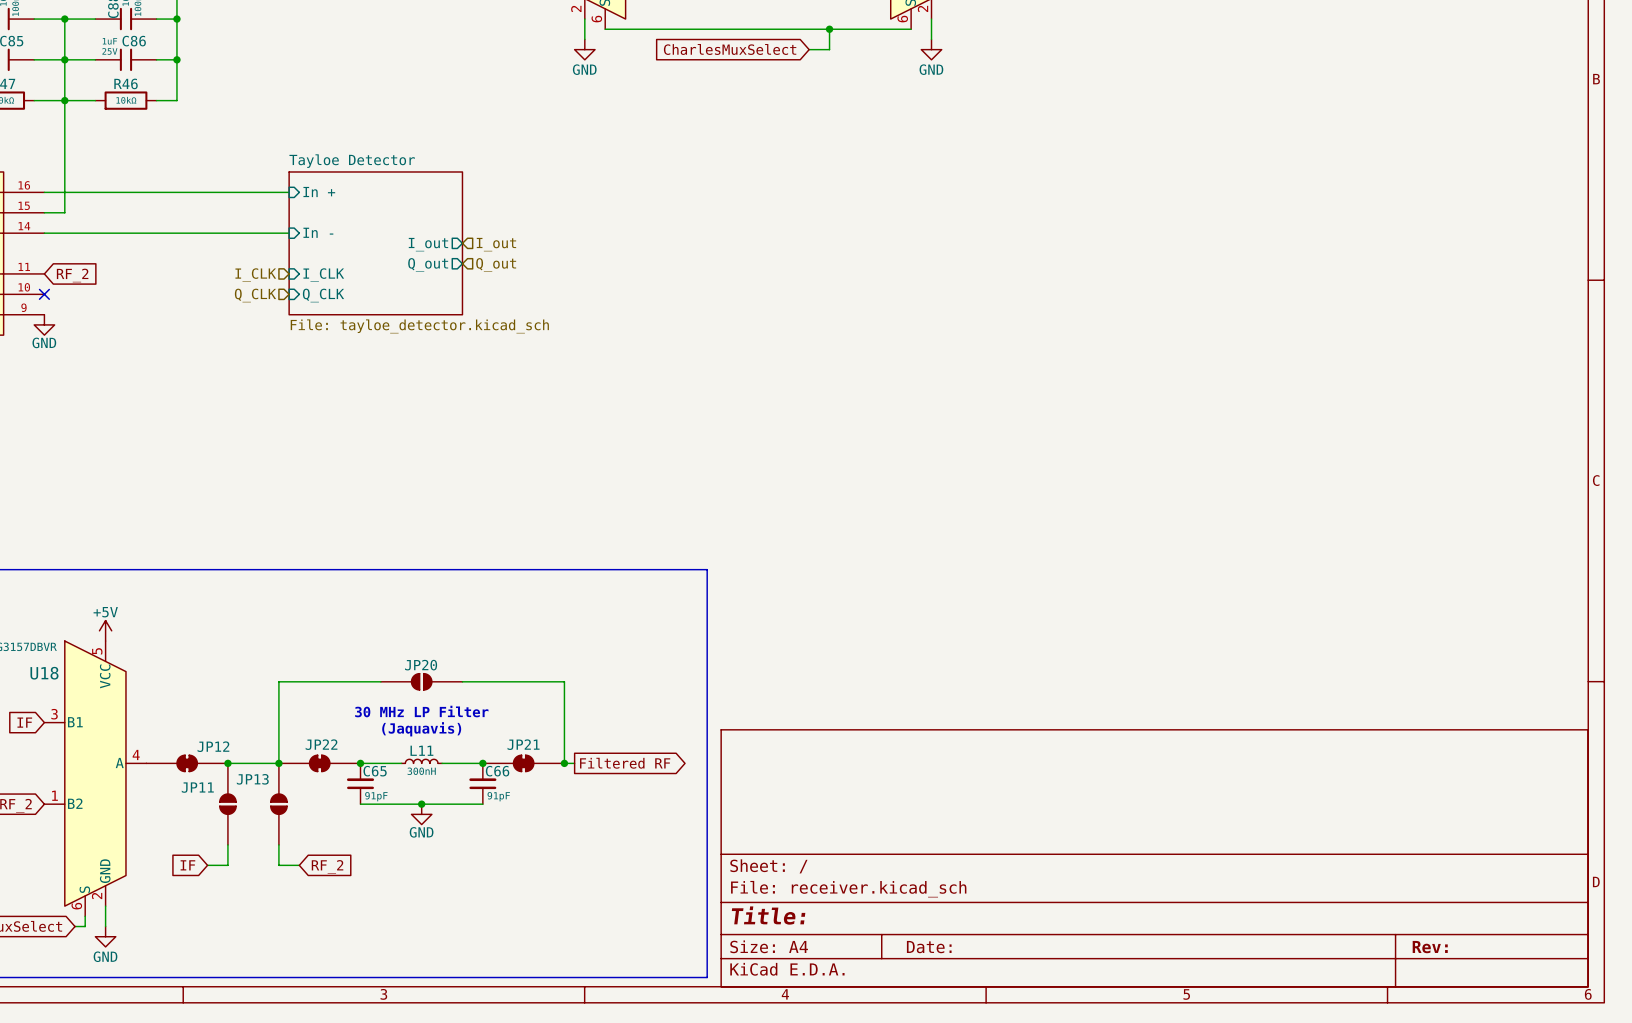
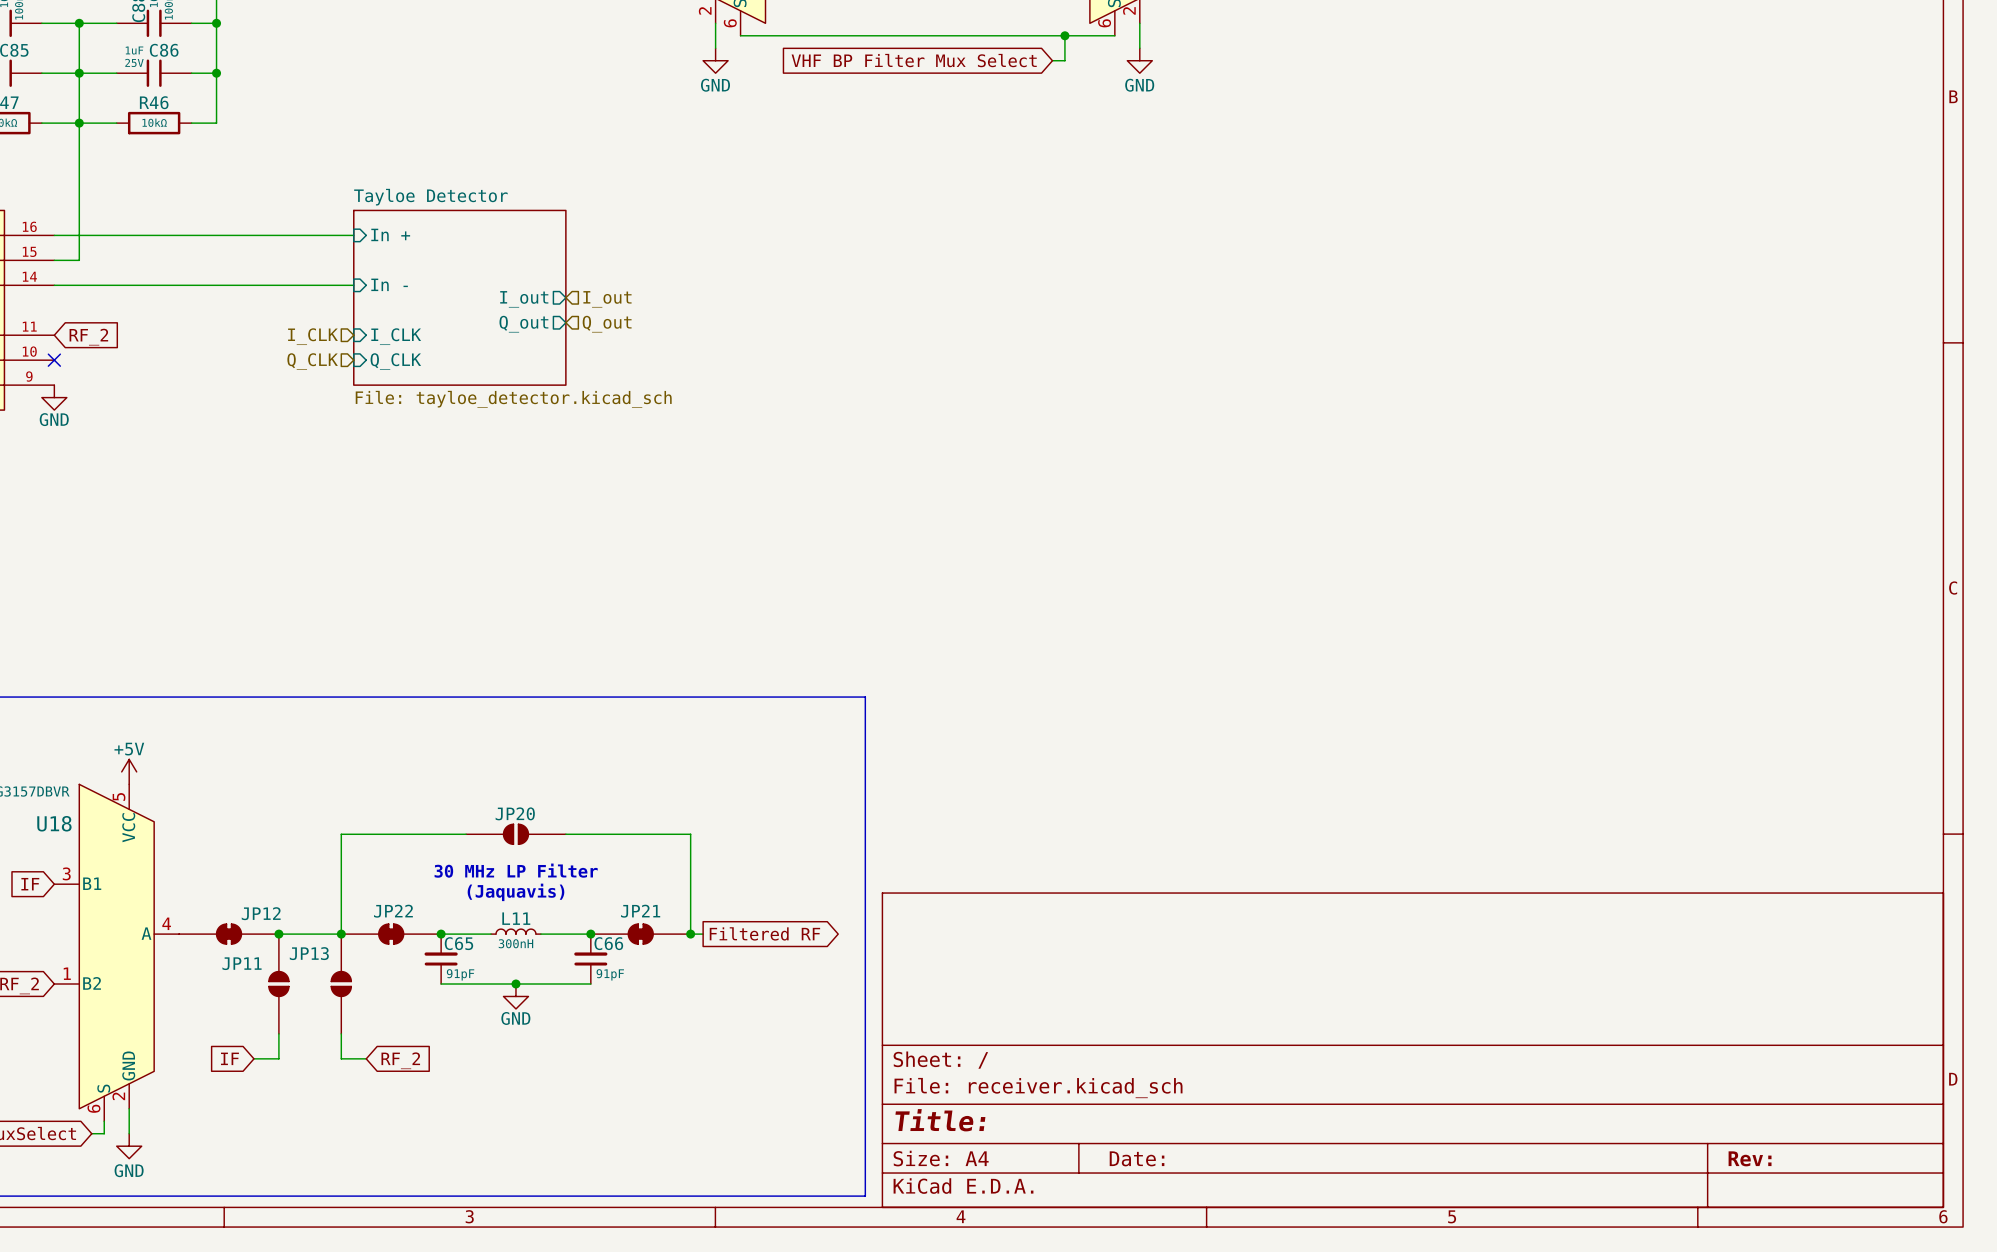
wire: (829, 29) (829, 49) (809, 49) -> none
junction position: (829, 29) -> (1064, 35)
wire: none -> (1064, 35) (1064, 60) (1052, 60)
global label: CharlesMuxSelect (730, 49) -> none
global label: none -> VHF BP Filter Mux Select (914, 60)

